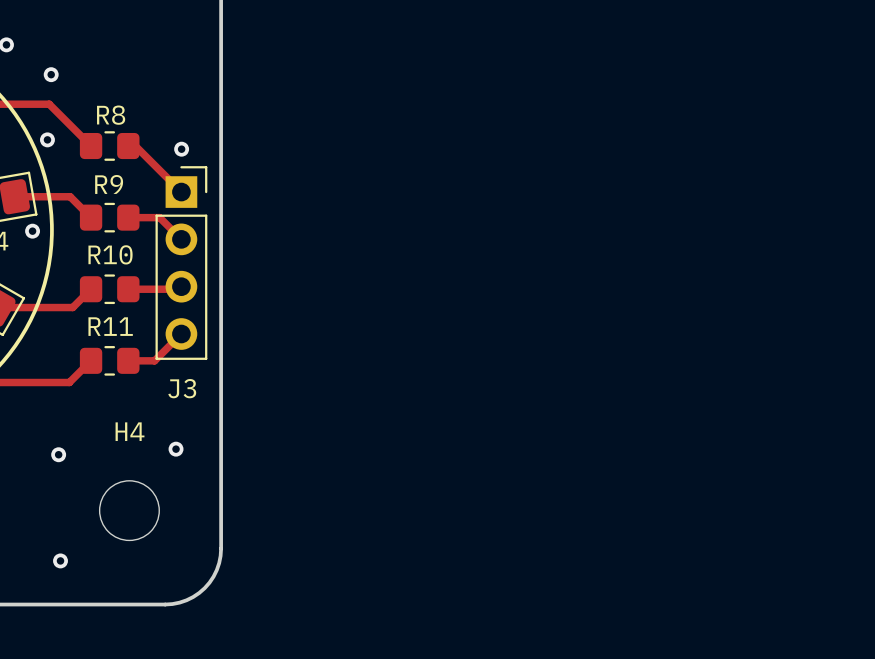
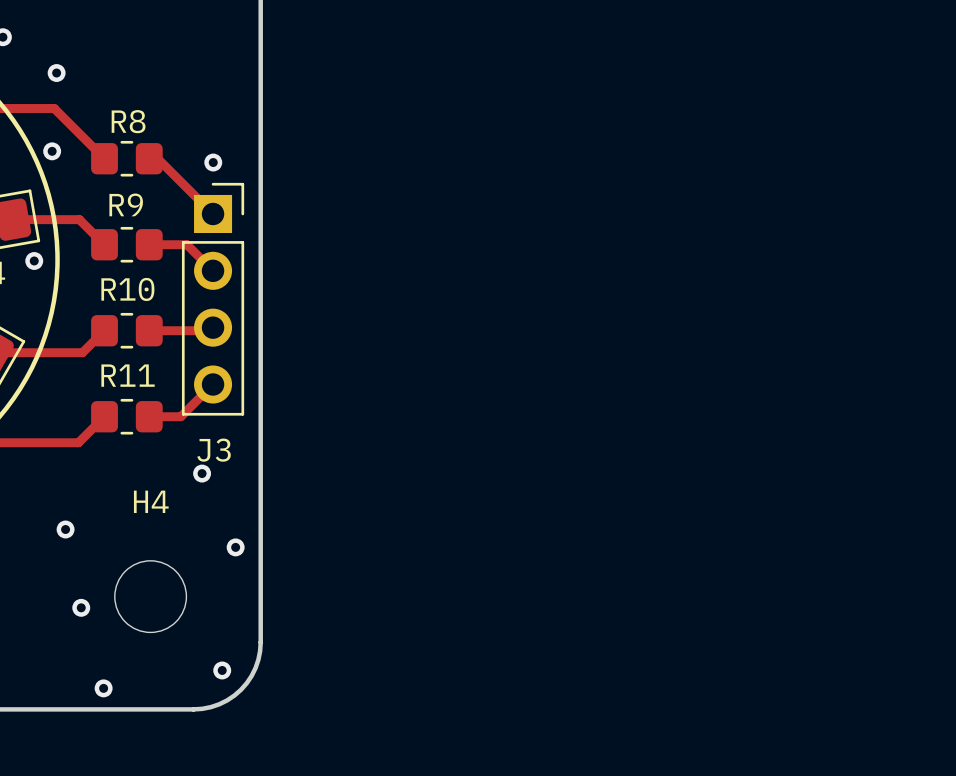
via: none -> (202, 473)
via: (176, 449) -> none
via: none -> (235, 547)
via: none -> (81, 607)
via: (60, 560) -> none
via: none -> (222, 670)
via: none -> (103, 688)

